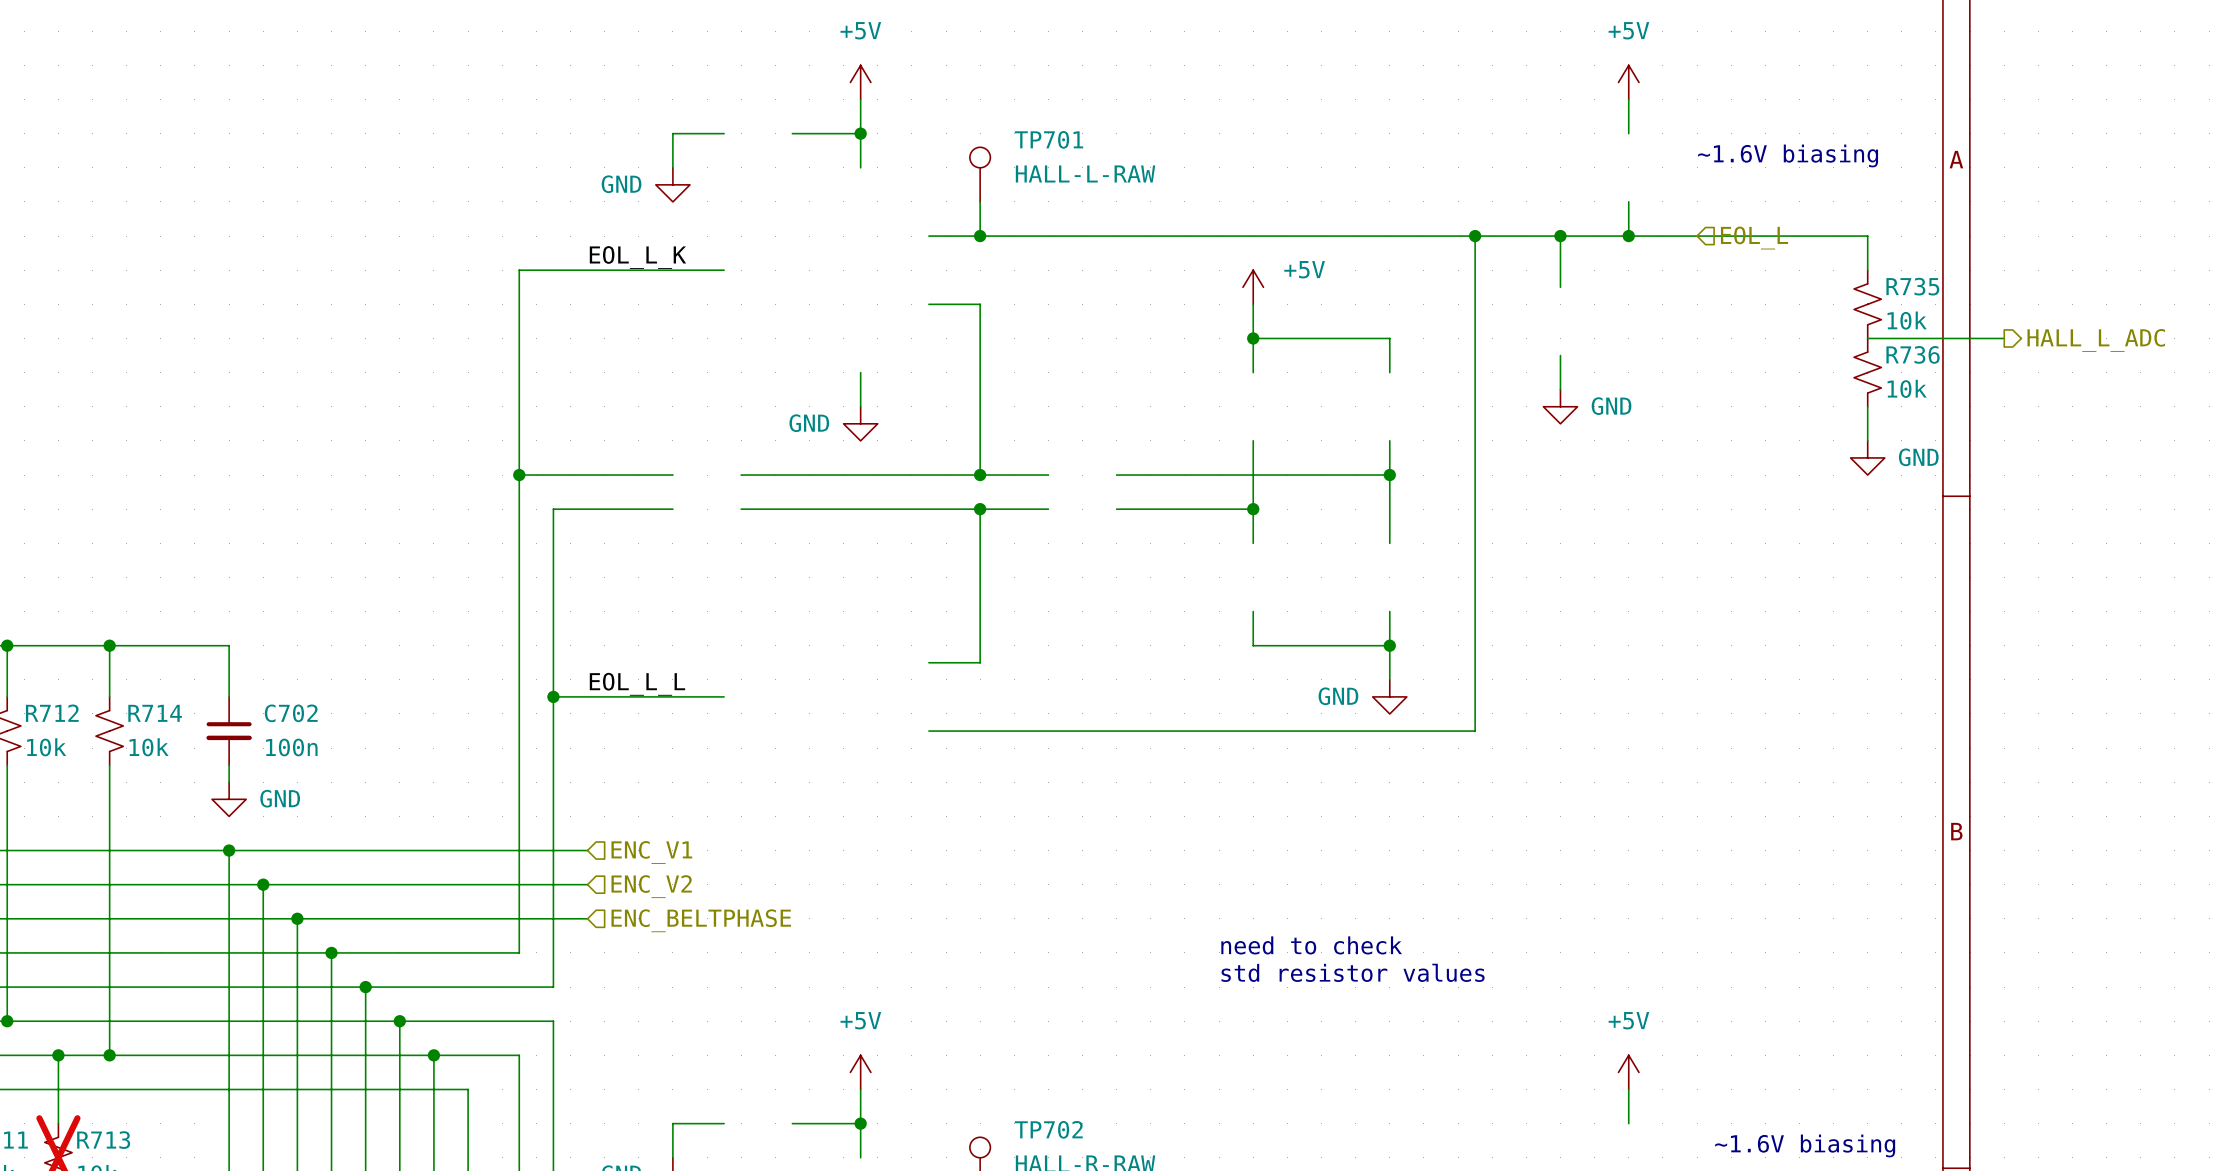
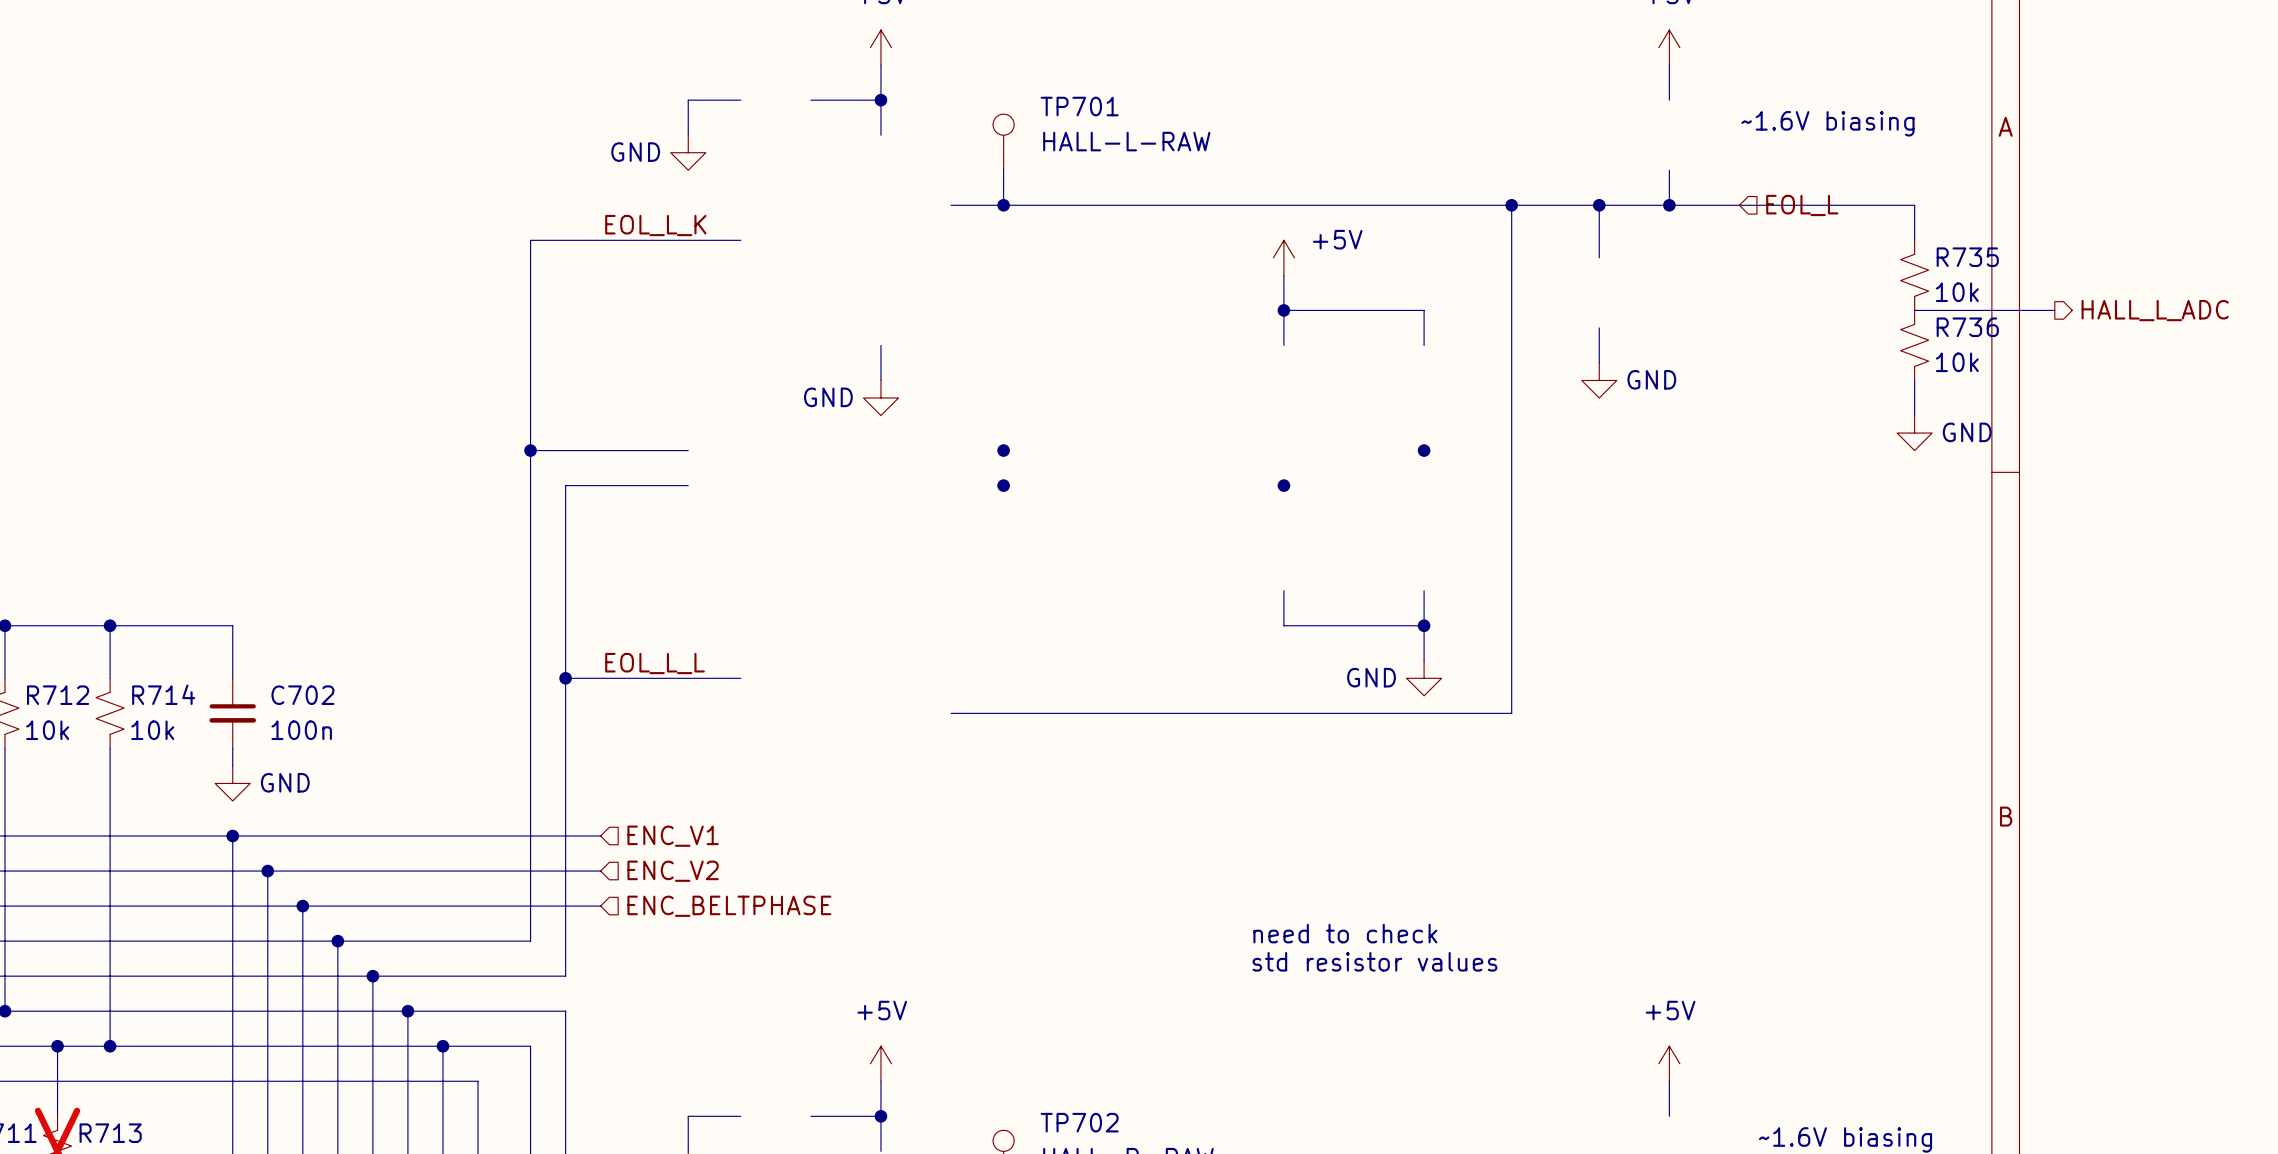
wire: (928, 304) (980, 304) (980, 475) -> none
wire: (1253, 440) (1253, 543) -> none
wire: (1389, 440) (1389, 543) -> none
wire: (741, 475) (1048, 475) -> none
wire: (1116, 475) (1389, 475) -> none
wire: (741, 509) (1048, 509) -> none
wire: (980, 509) (980, 662) (928, 662) -> none
wire: (1116, 509) (1253, 509) -> none

